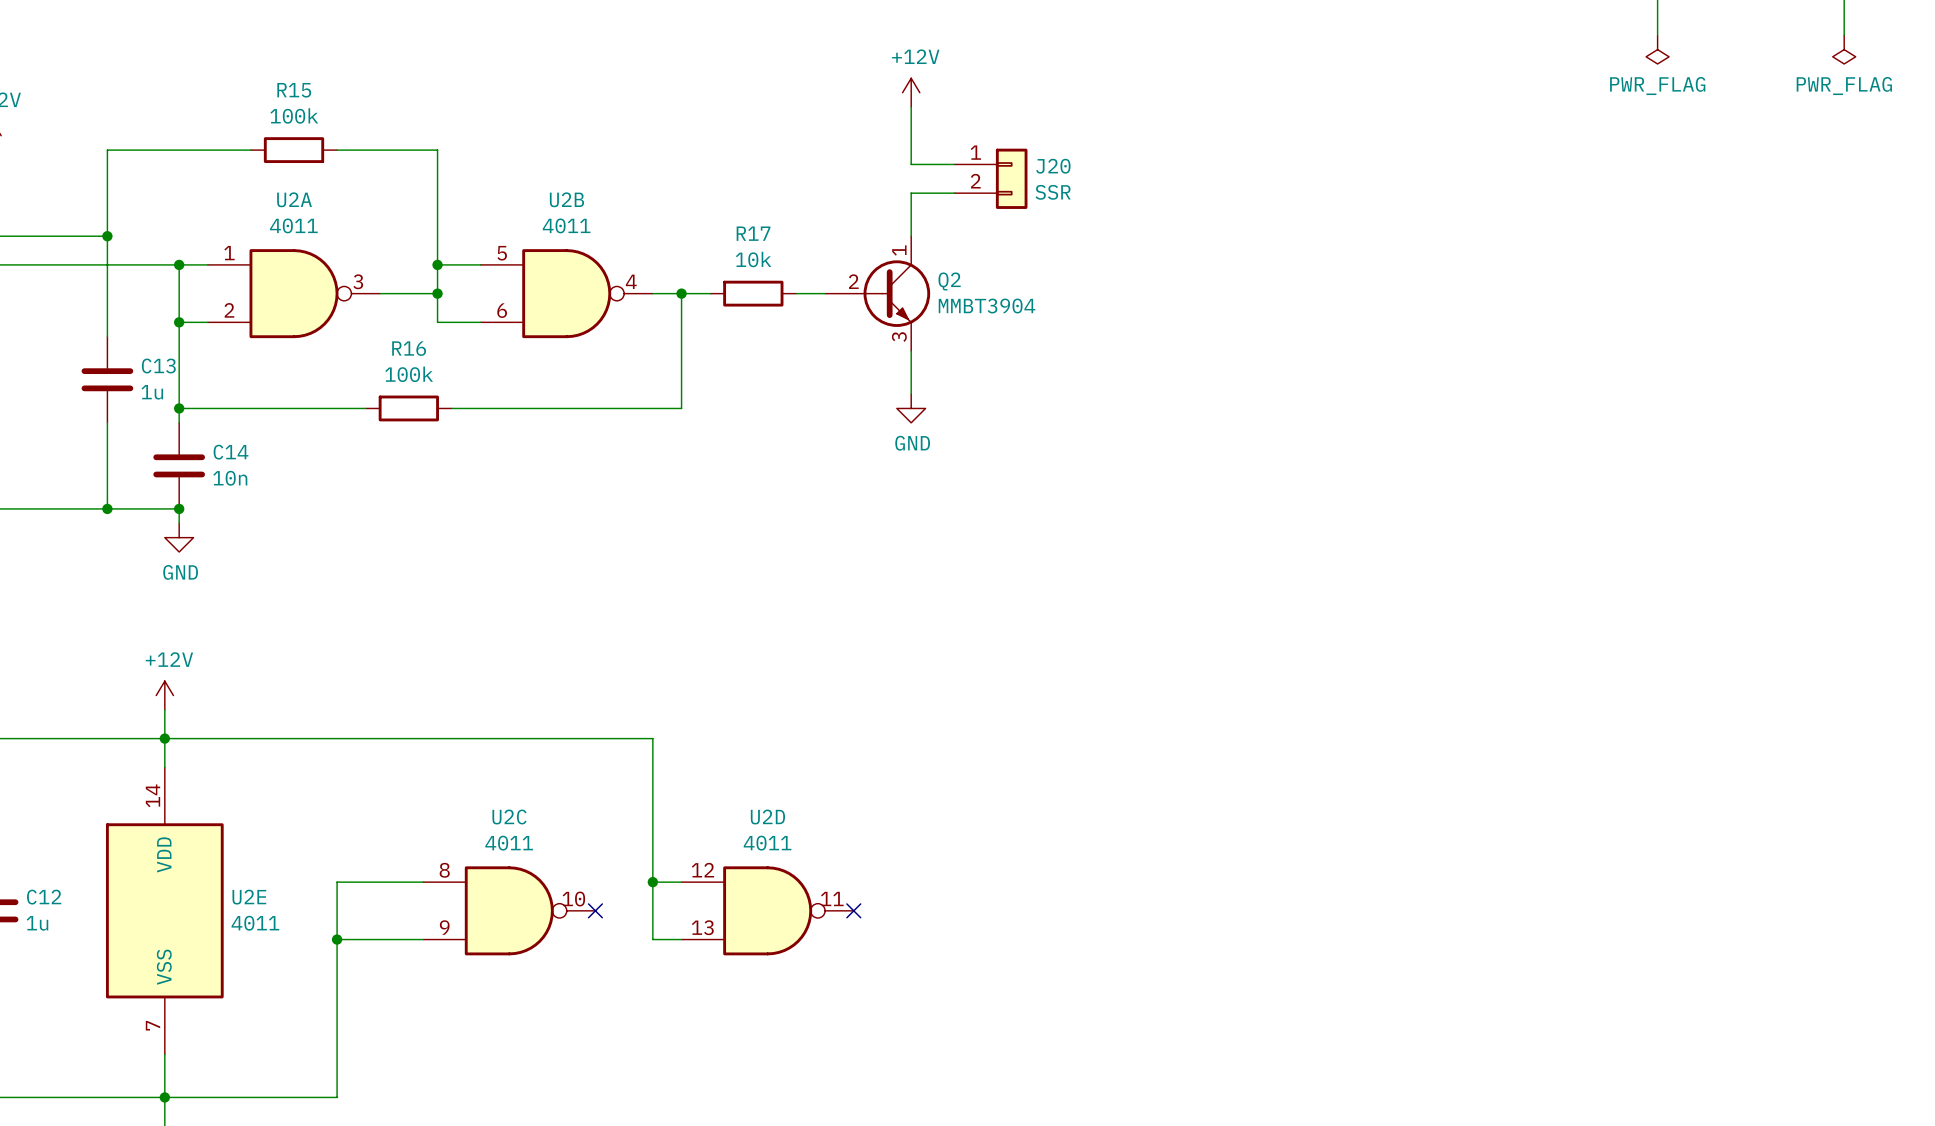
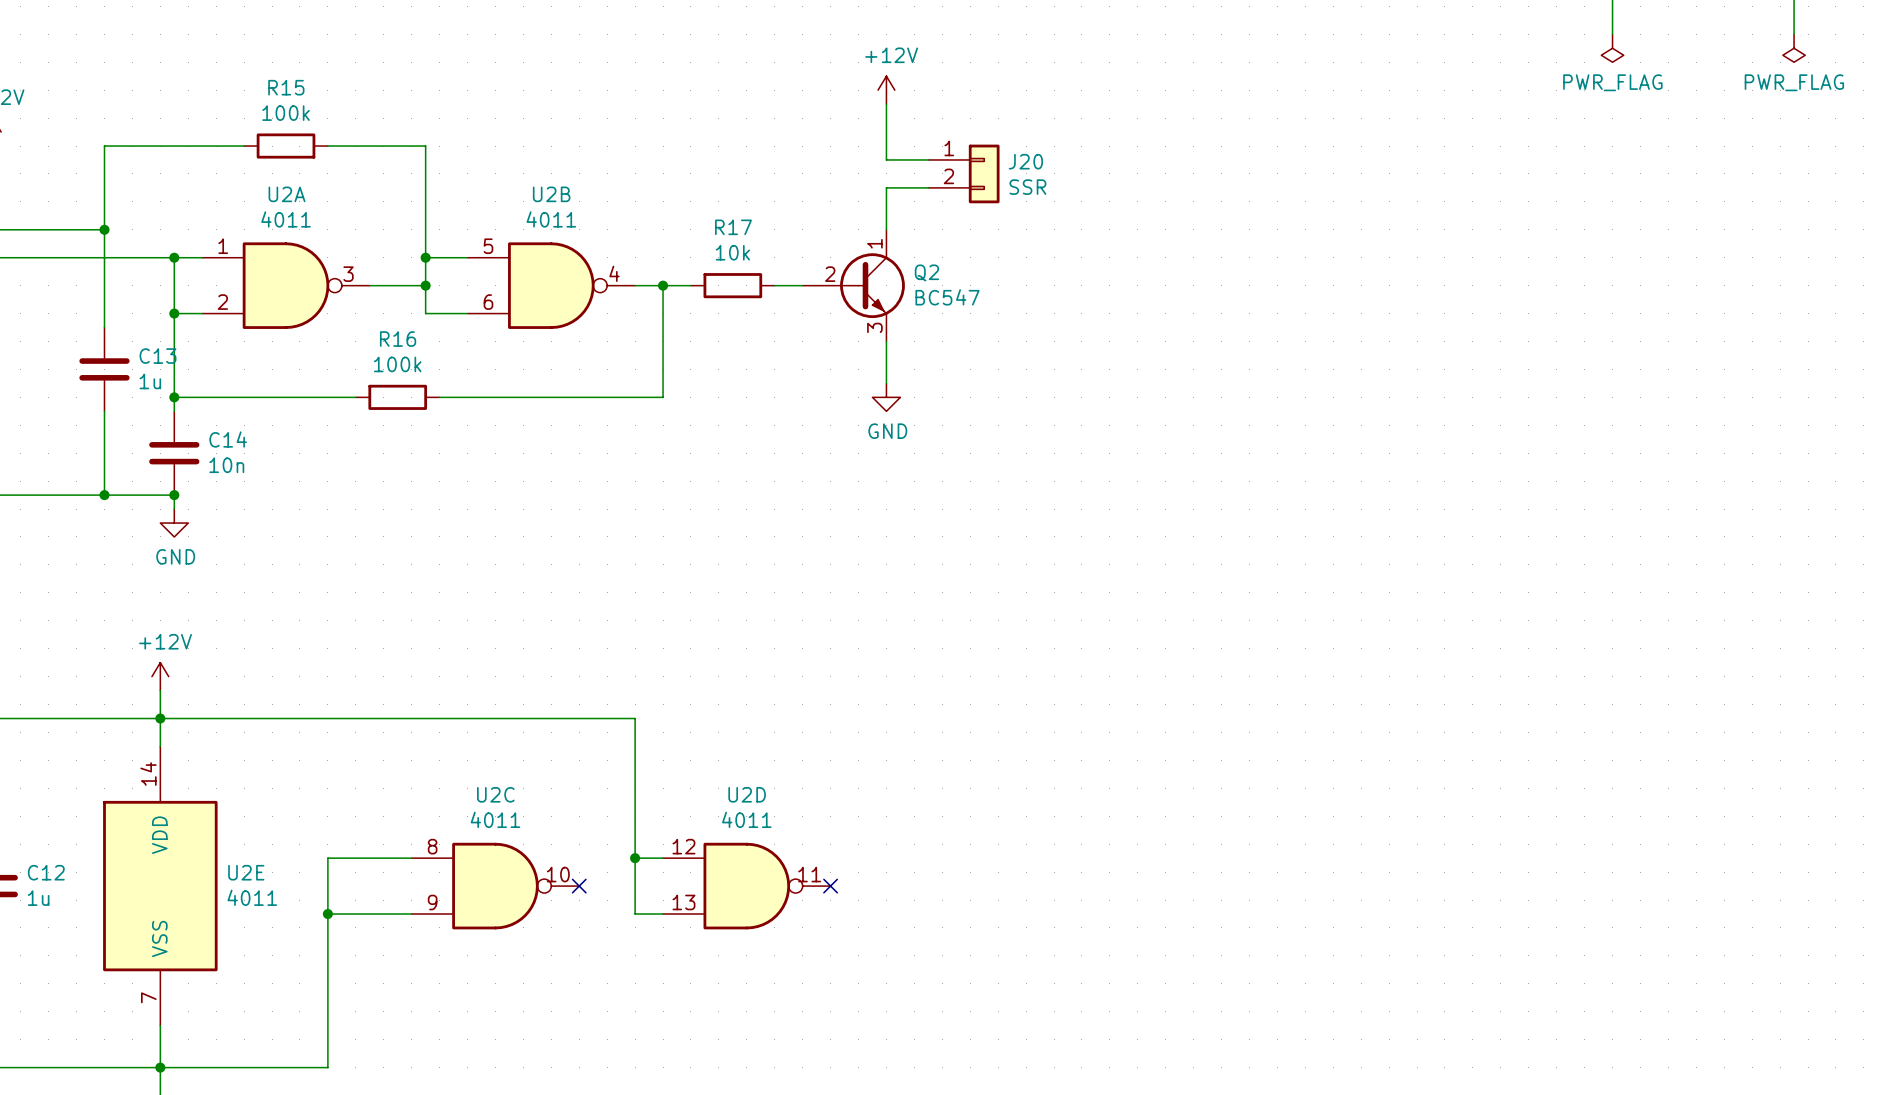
Q2 value: MMBT3904 (987, 306) -> BC547 (947, 297)

